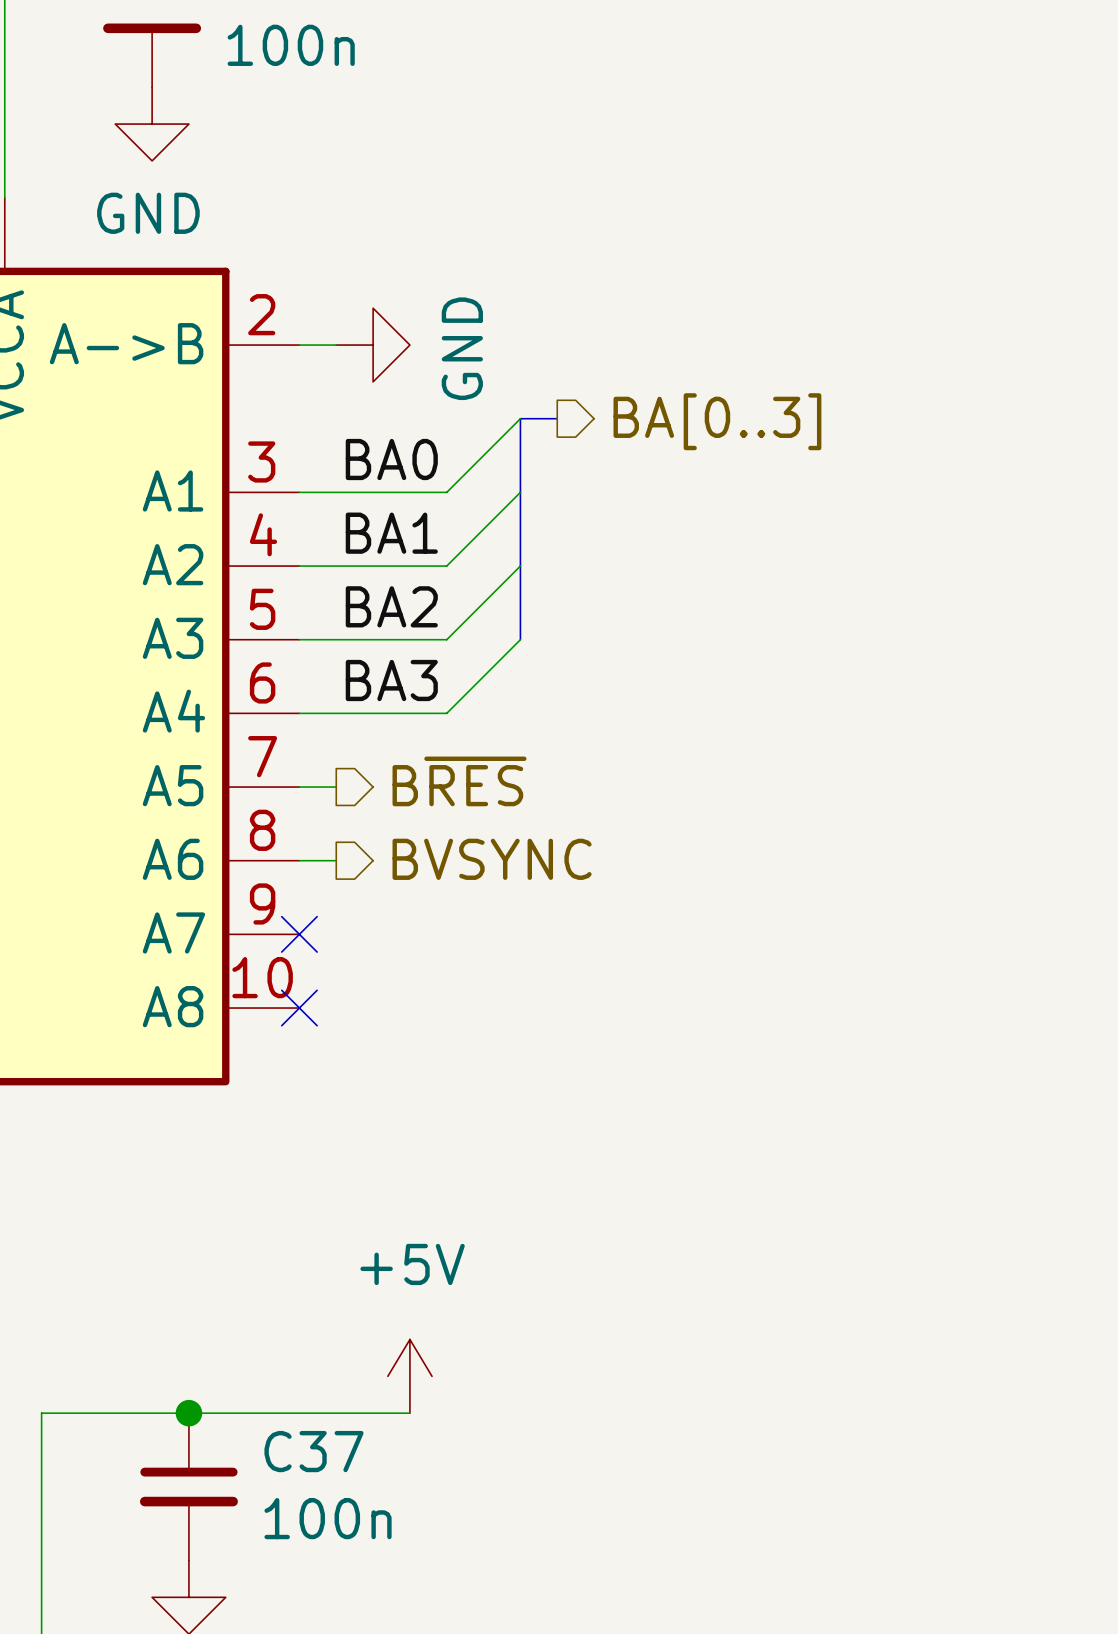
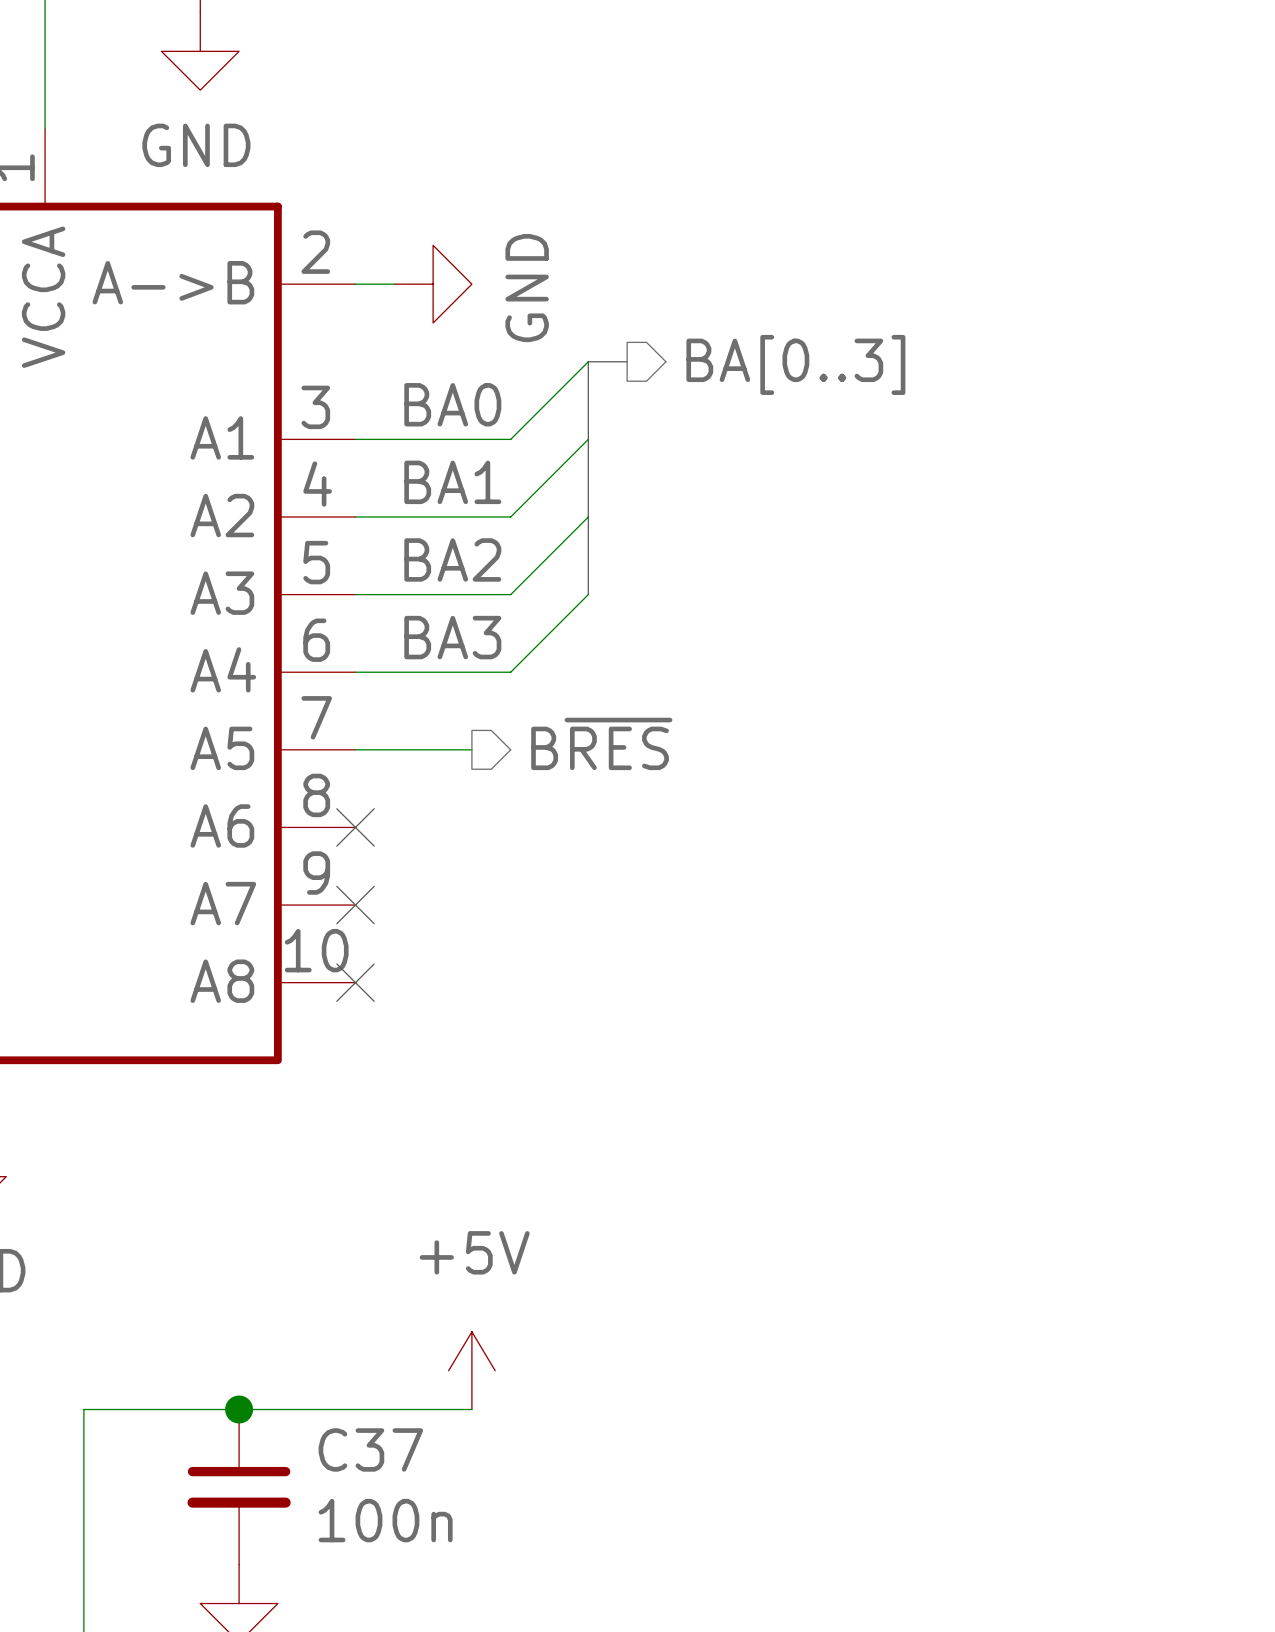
hierarchical label position: B~{RES} (459, 781) -> B~{RES} (601, 743)
wire: none -> (394, 749) (471, 749)
hierarchical label: BVSYNC (492, 859) -> none
wire: (299, 860) (336, 860) -> none
no-connect mark: none -> (355, 827)

